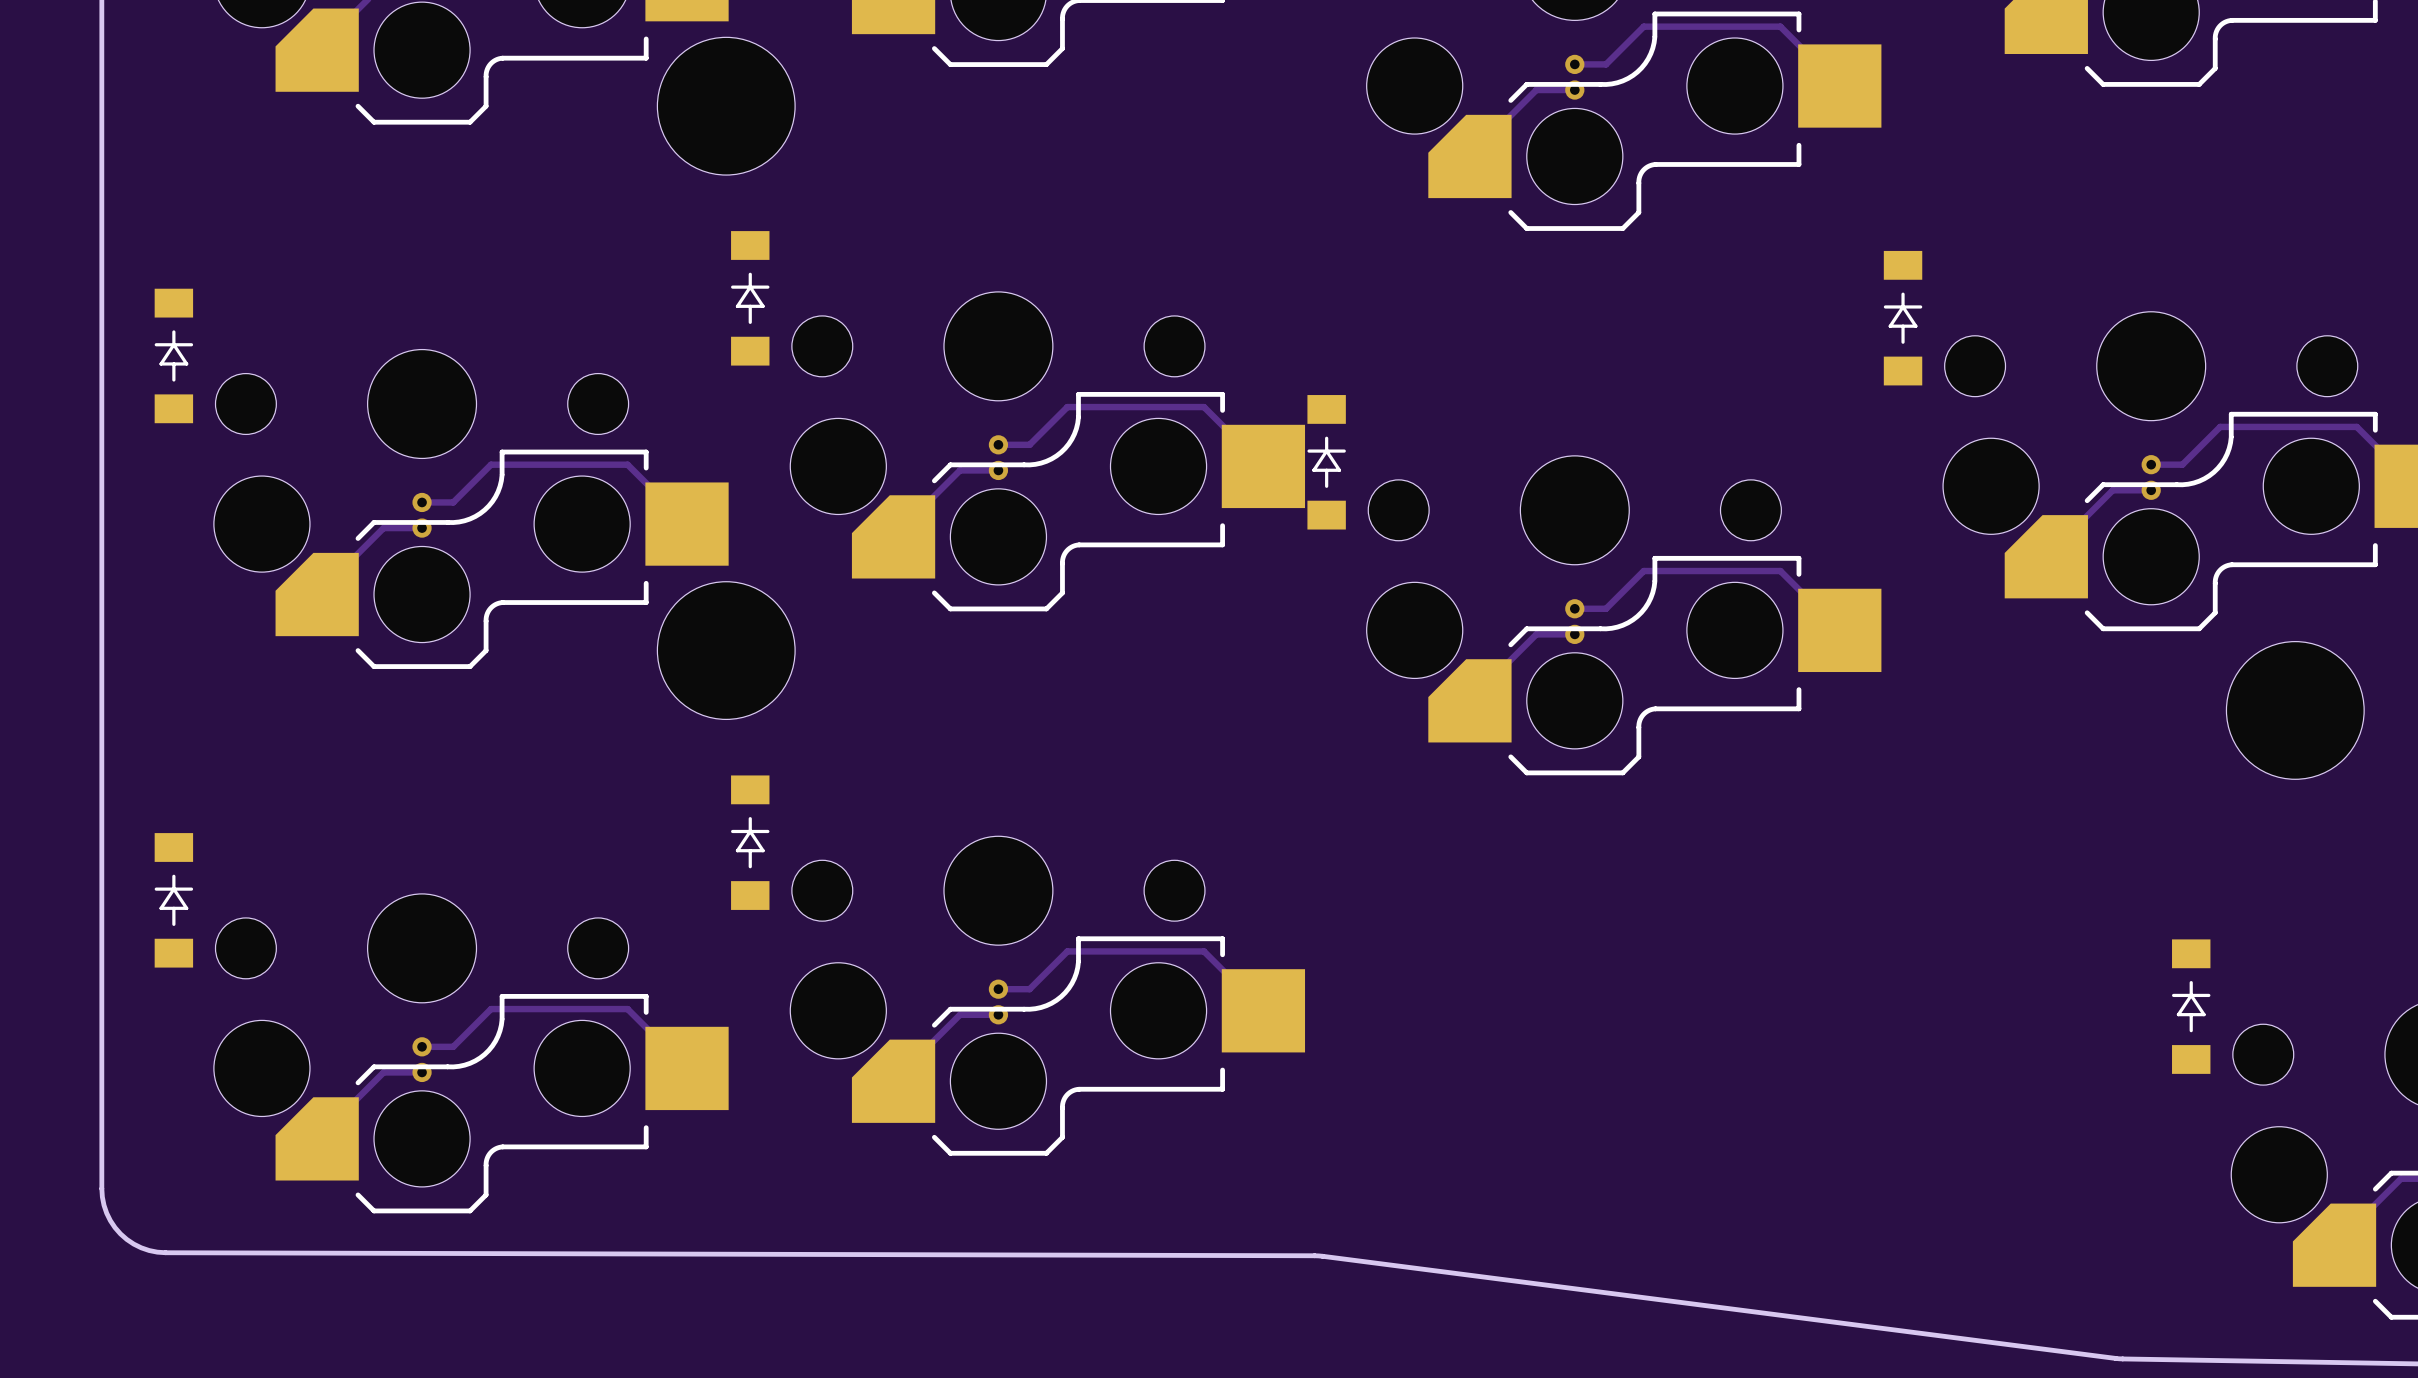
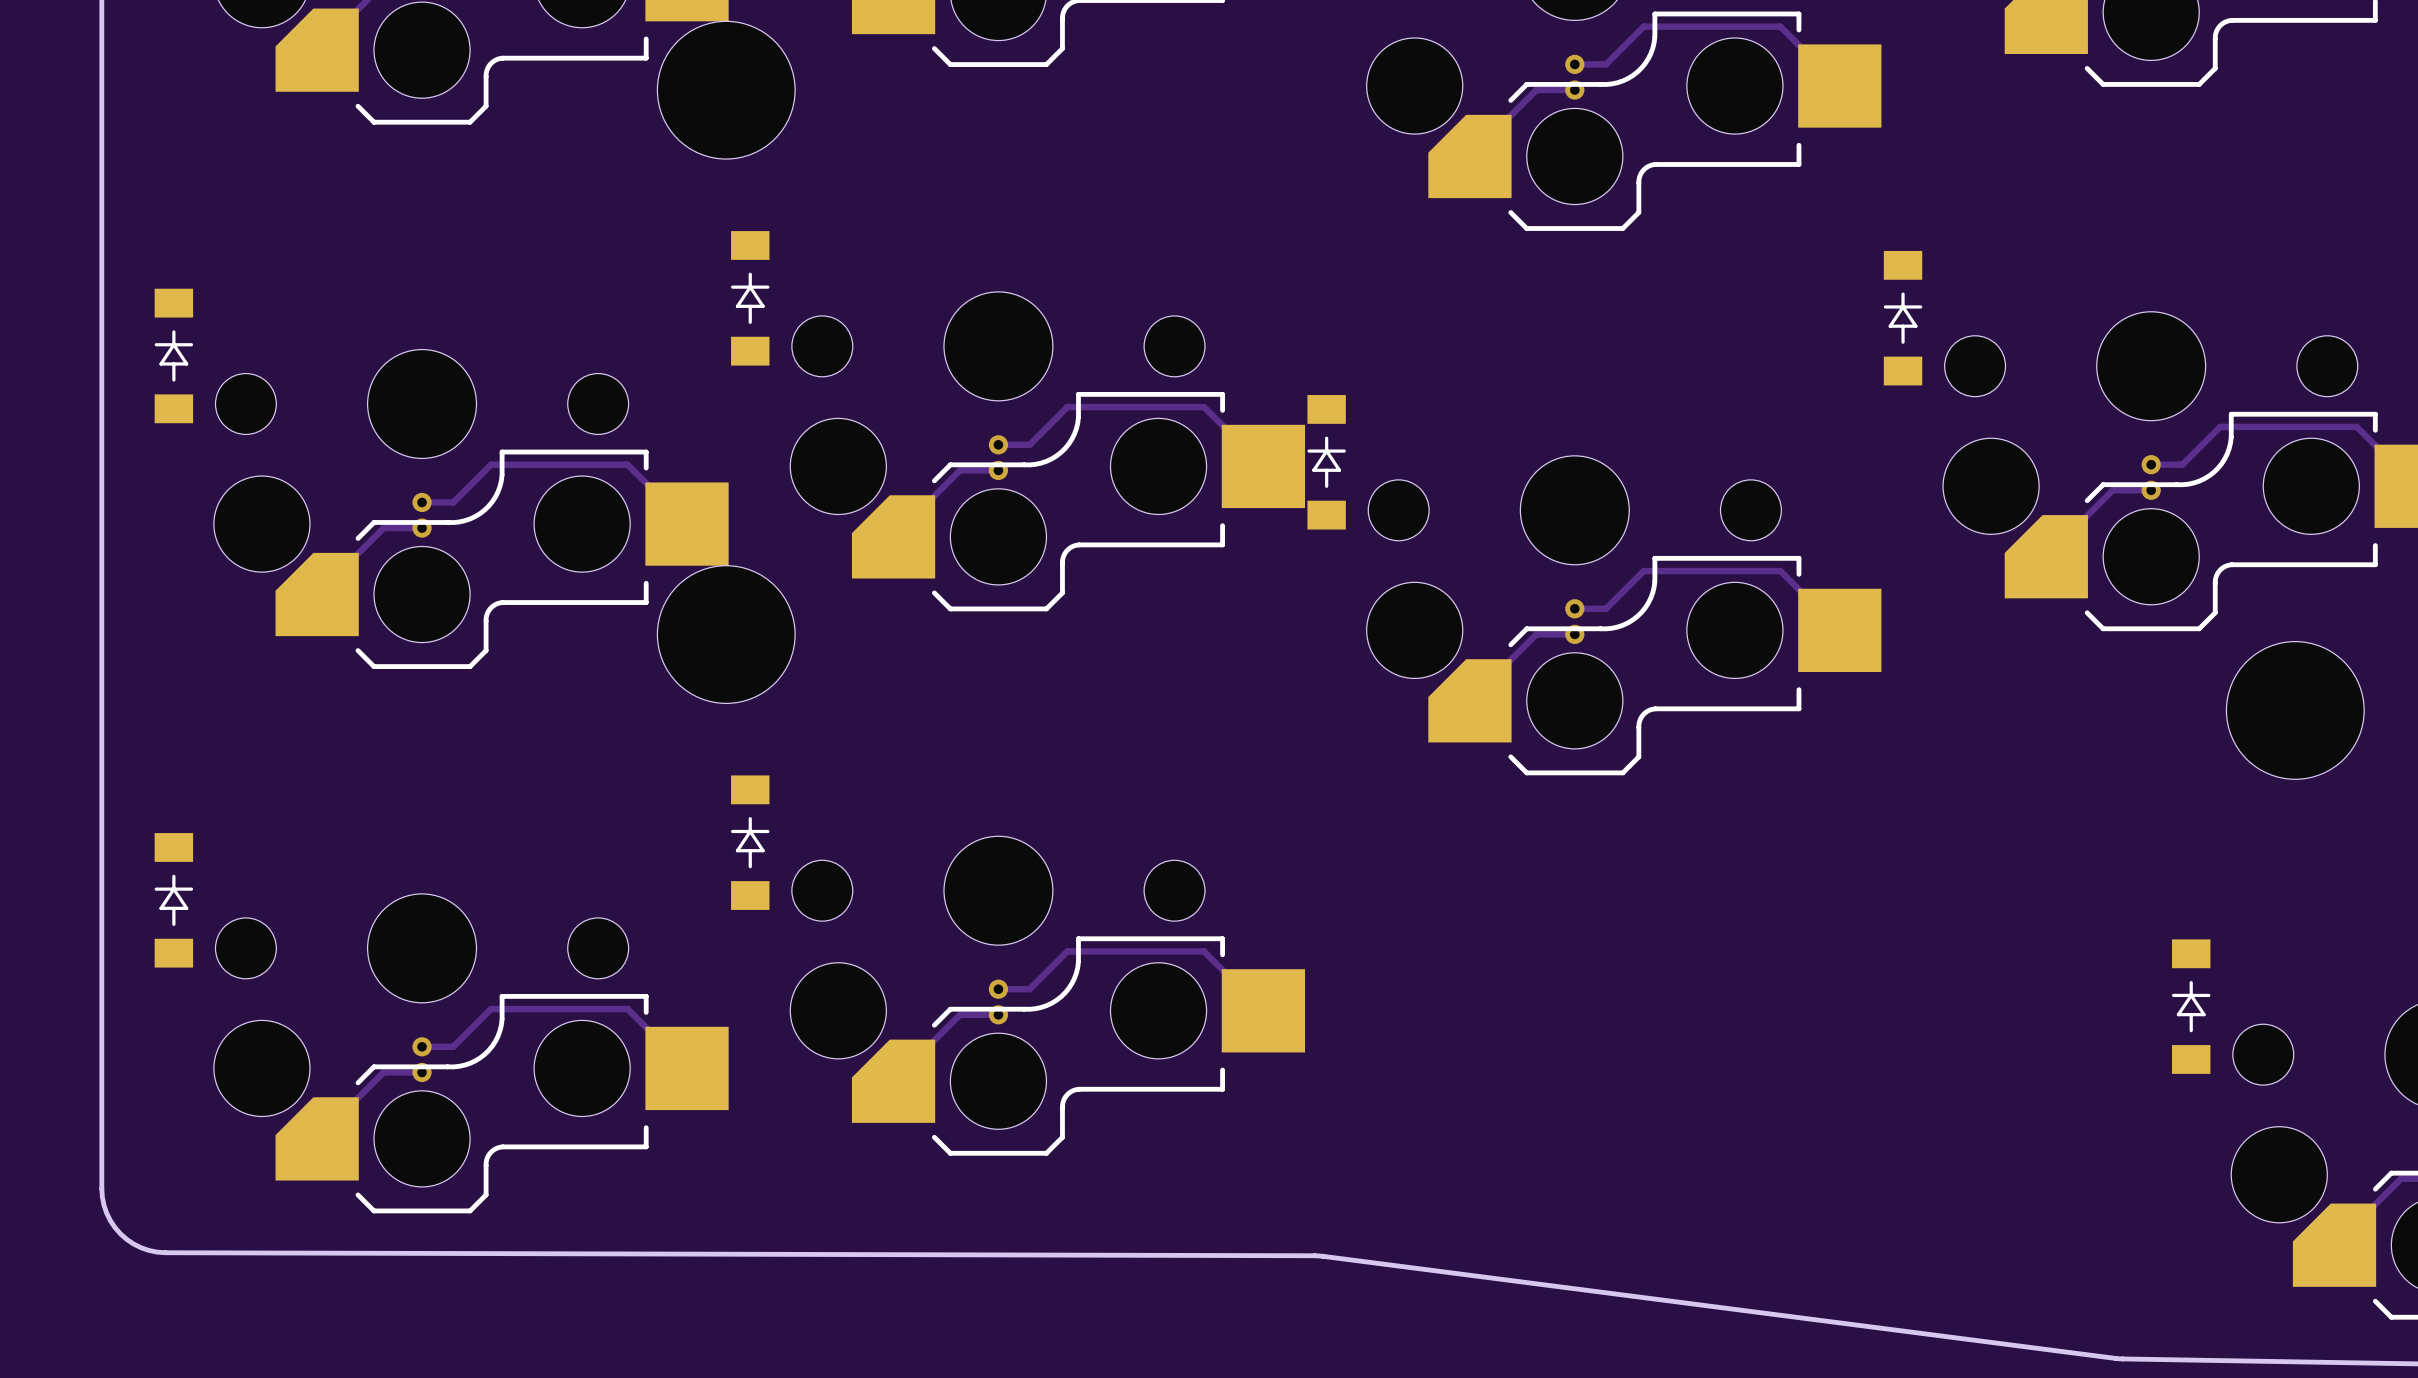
part position: (726, 106) -> (726, 90)
part position: (726, 650) -> (726, 634)

